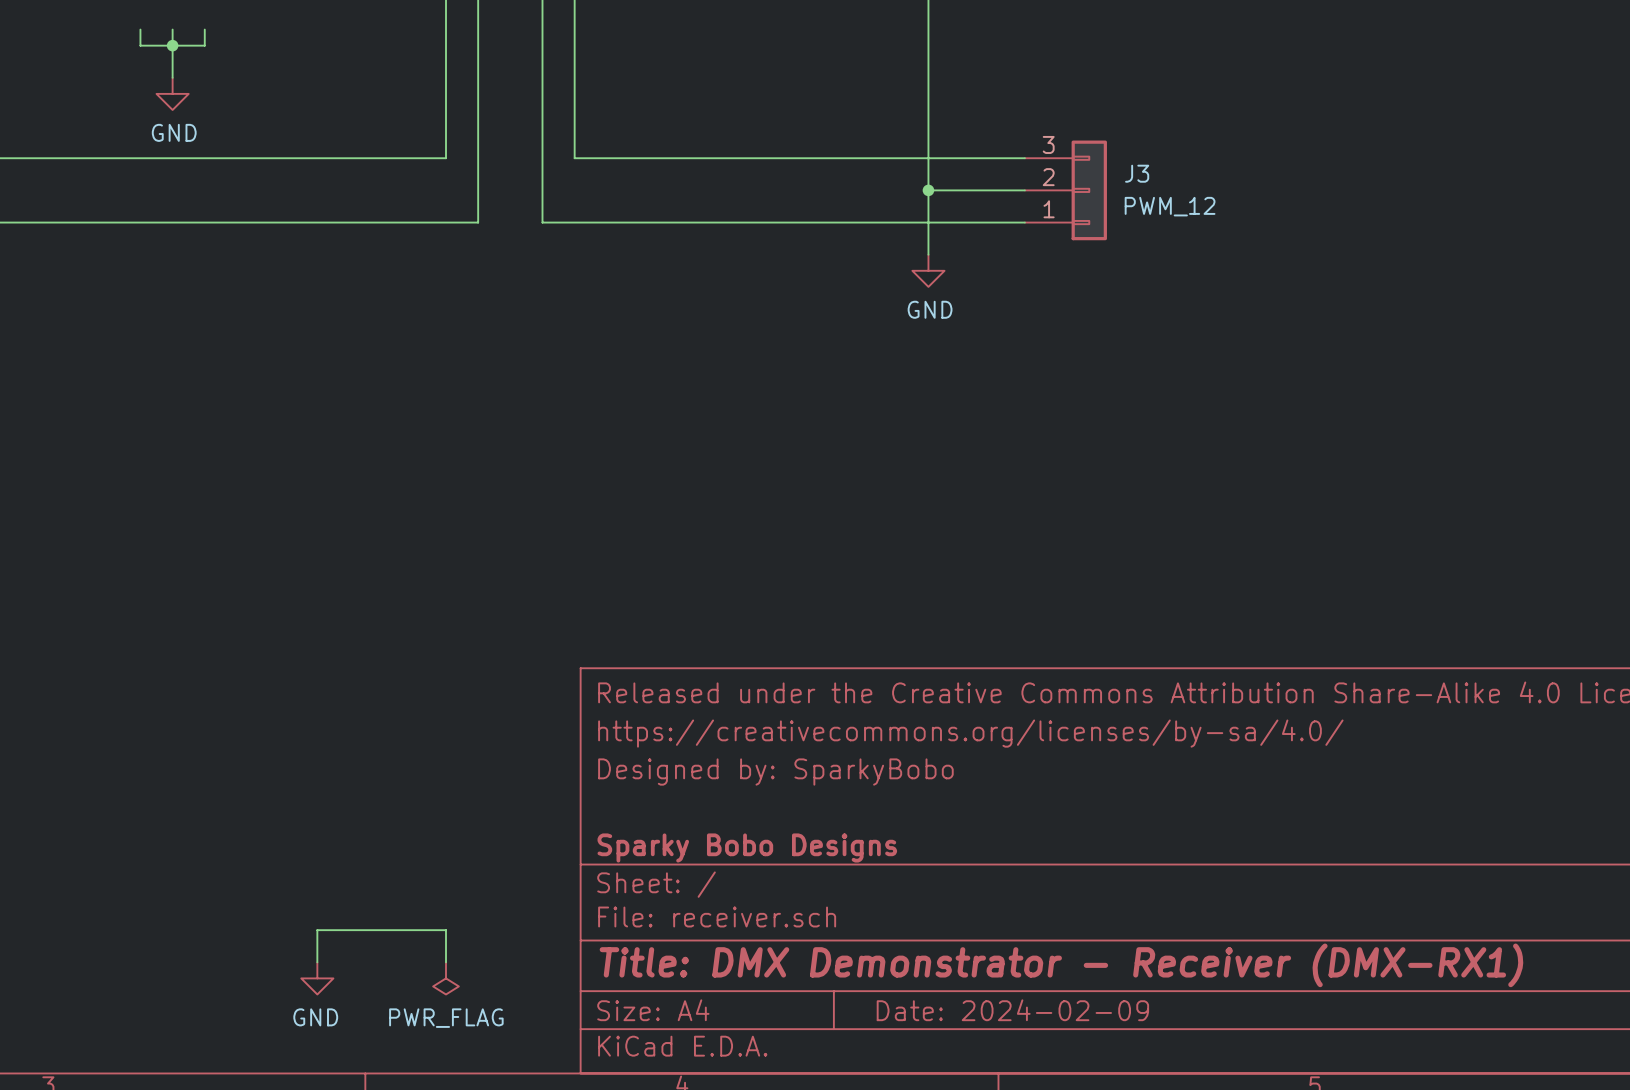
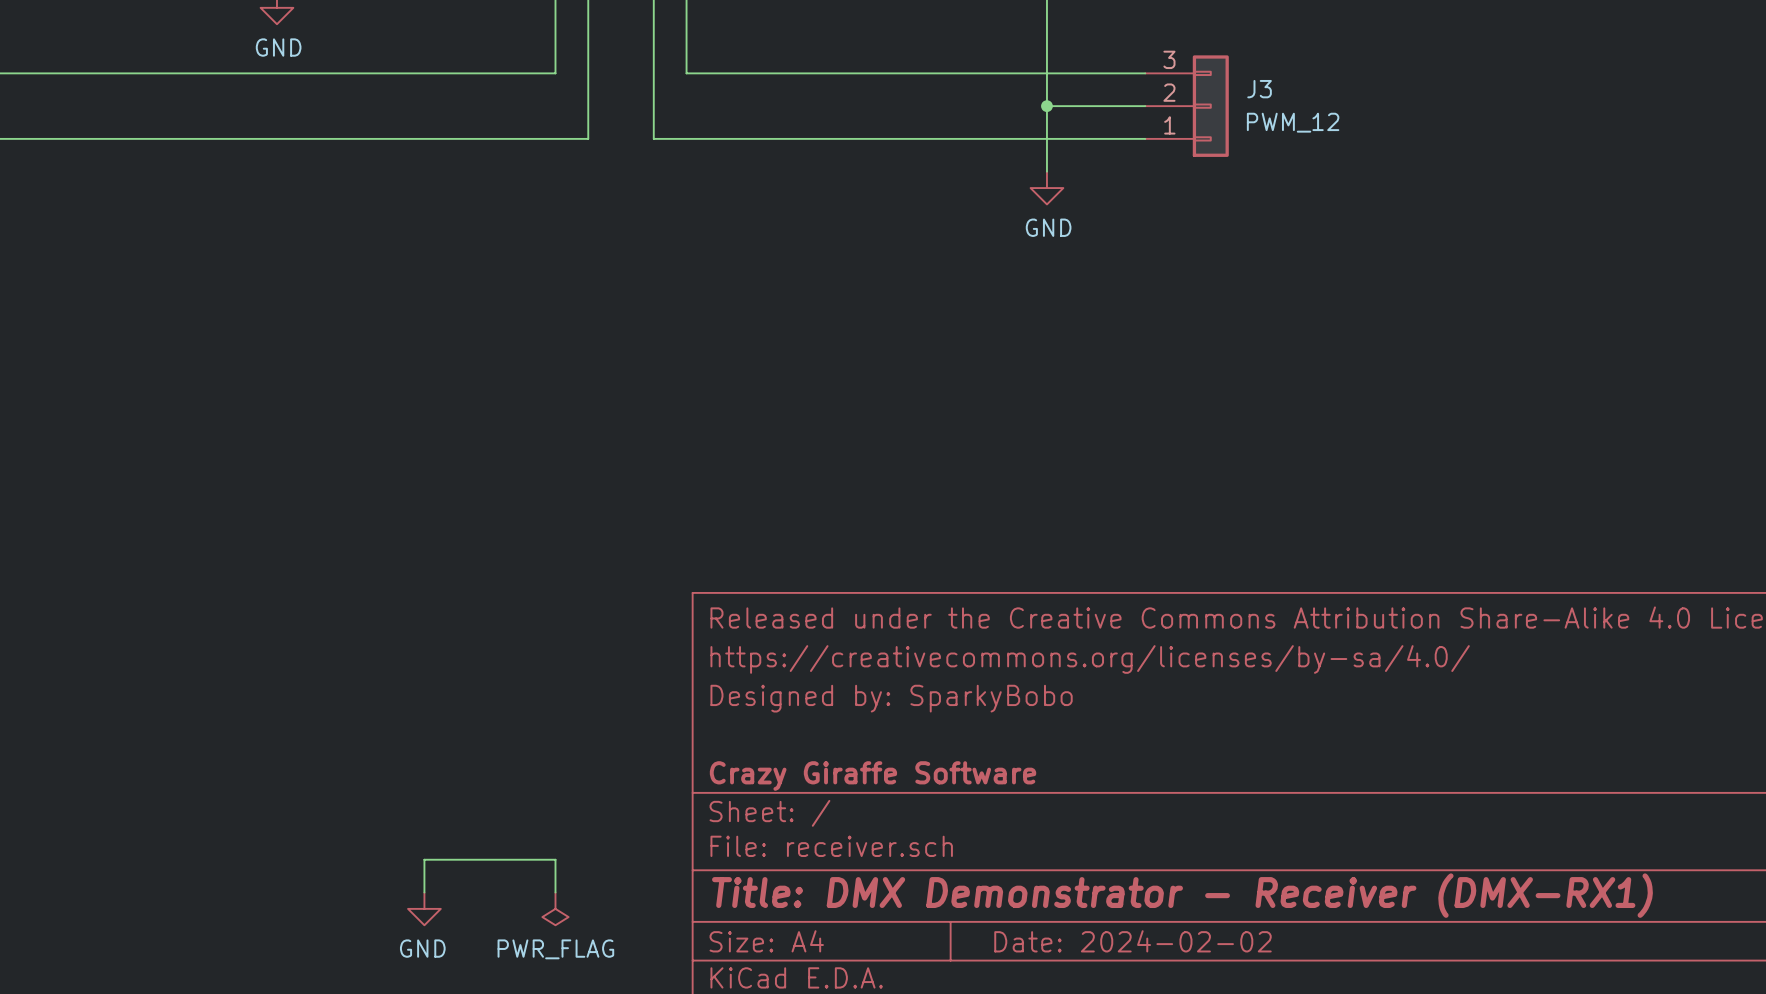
title block: Sparky Bobo Designs (747, 847) -> Crazy Giraffe Software (873, 776)
title block: Date: 2024-02-09 (1012, 1010) -> Date: 2024-02-02 (1132, 941)

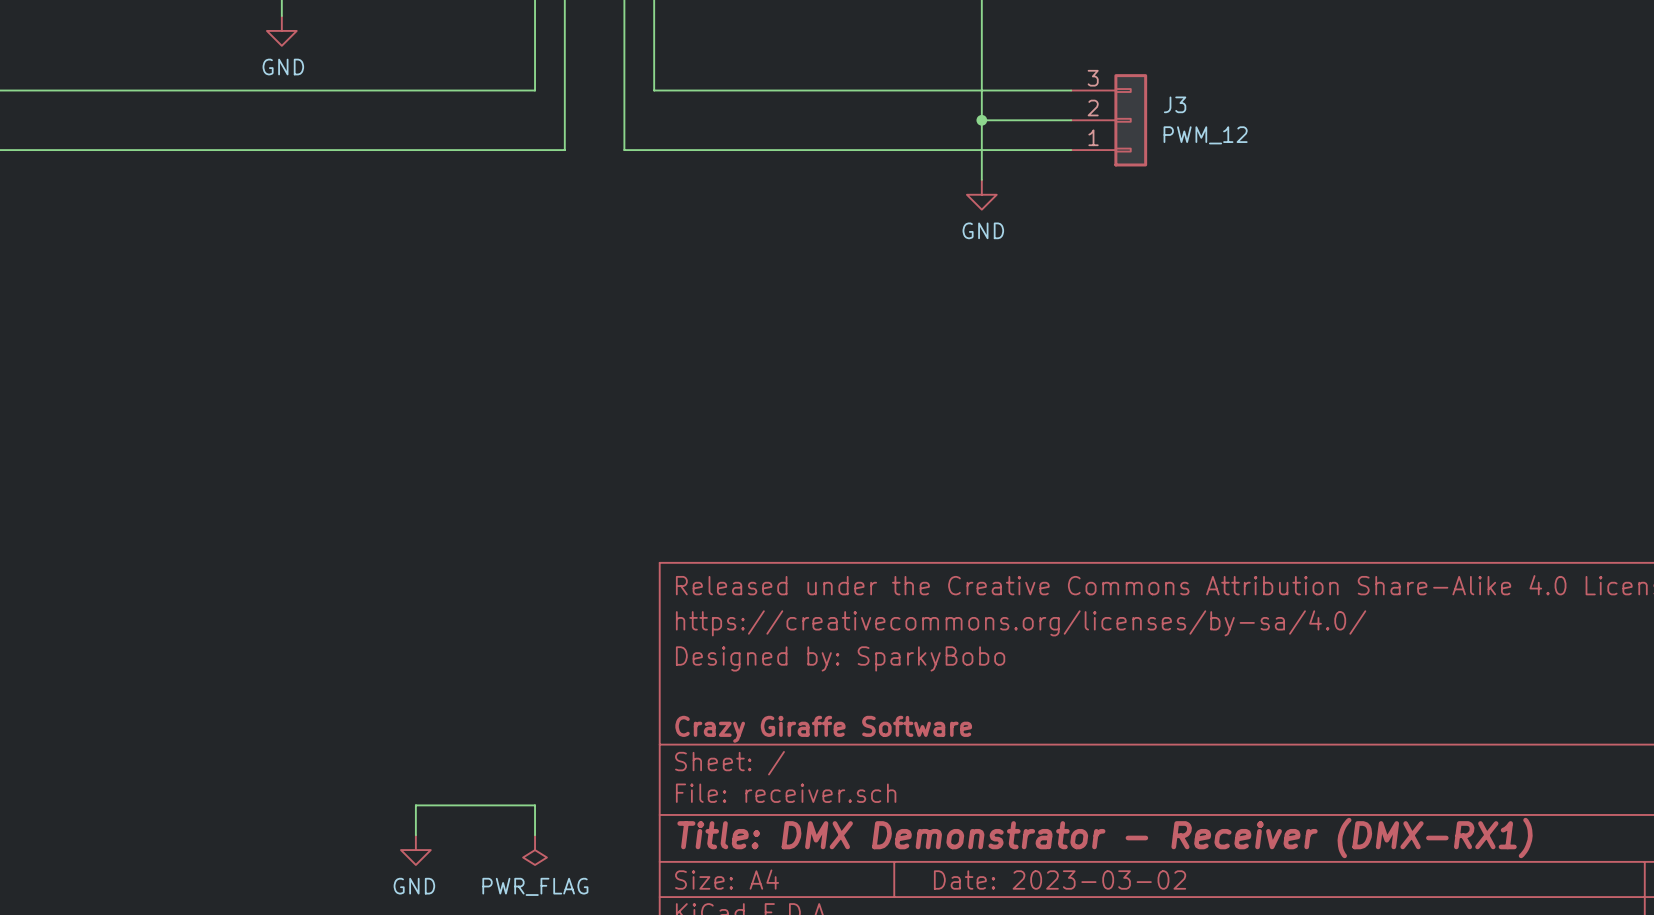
title block: Date: 2024-02-02 (1132, 941) -> Date: 2023-03-02 (1060, 879)

